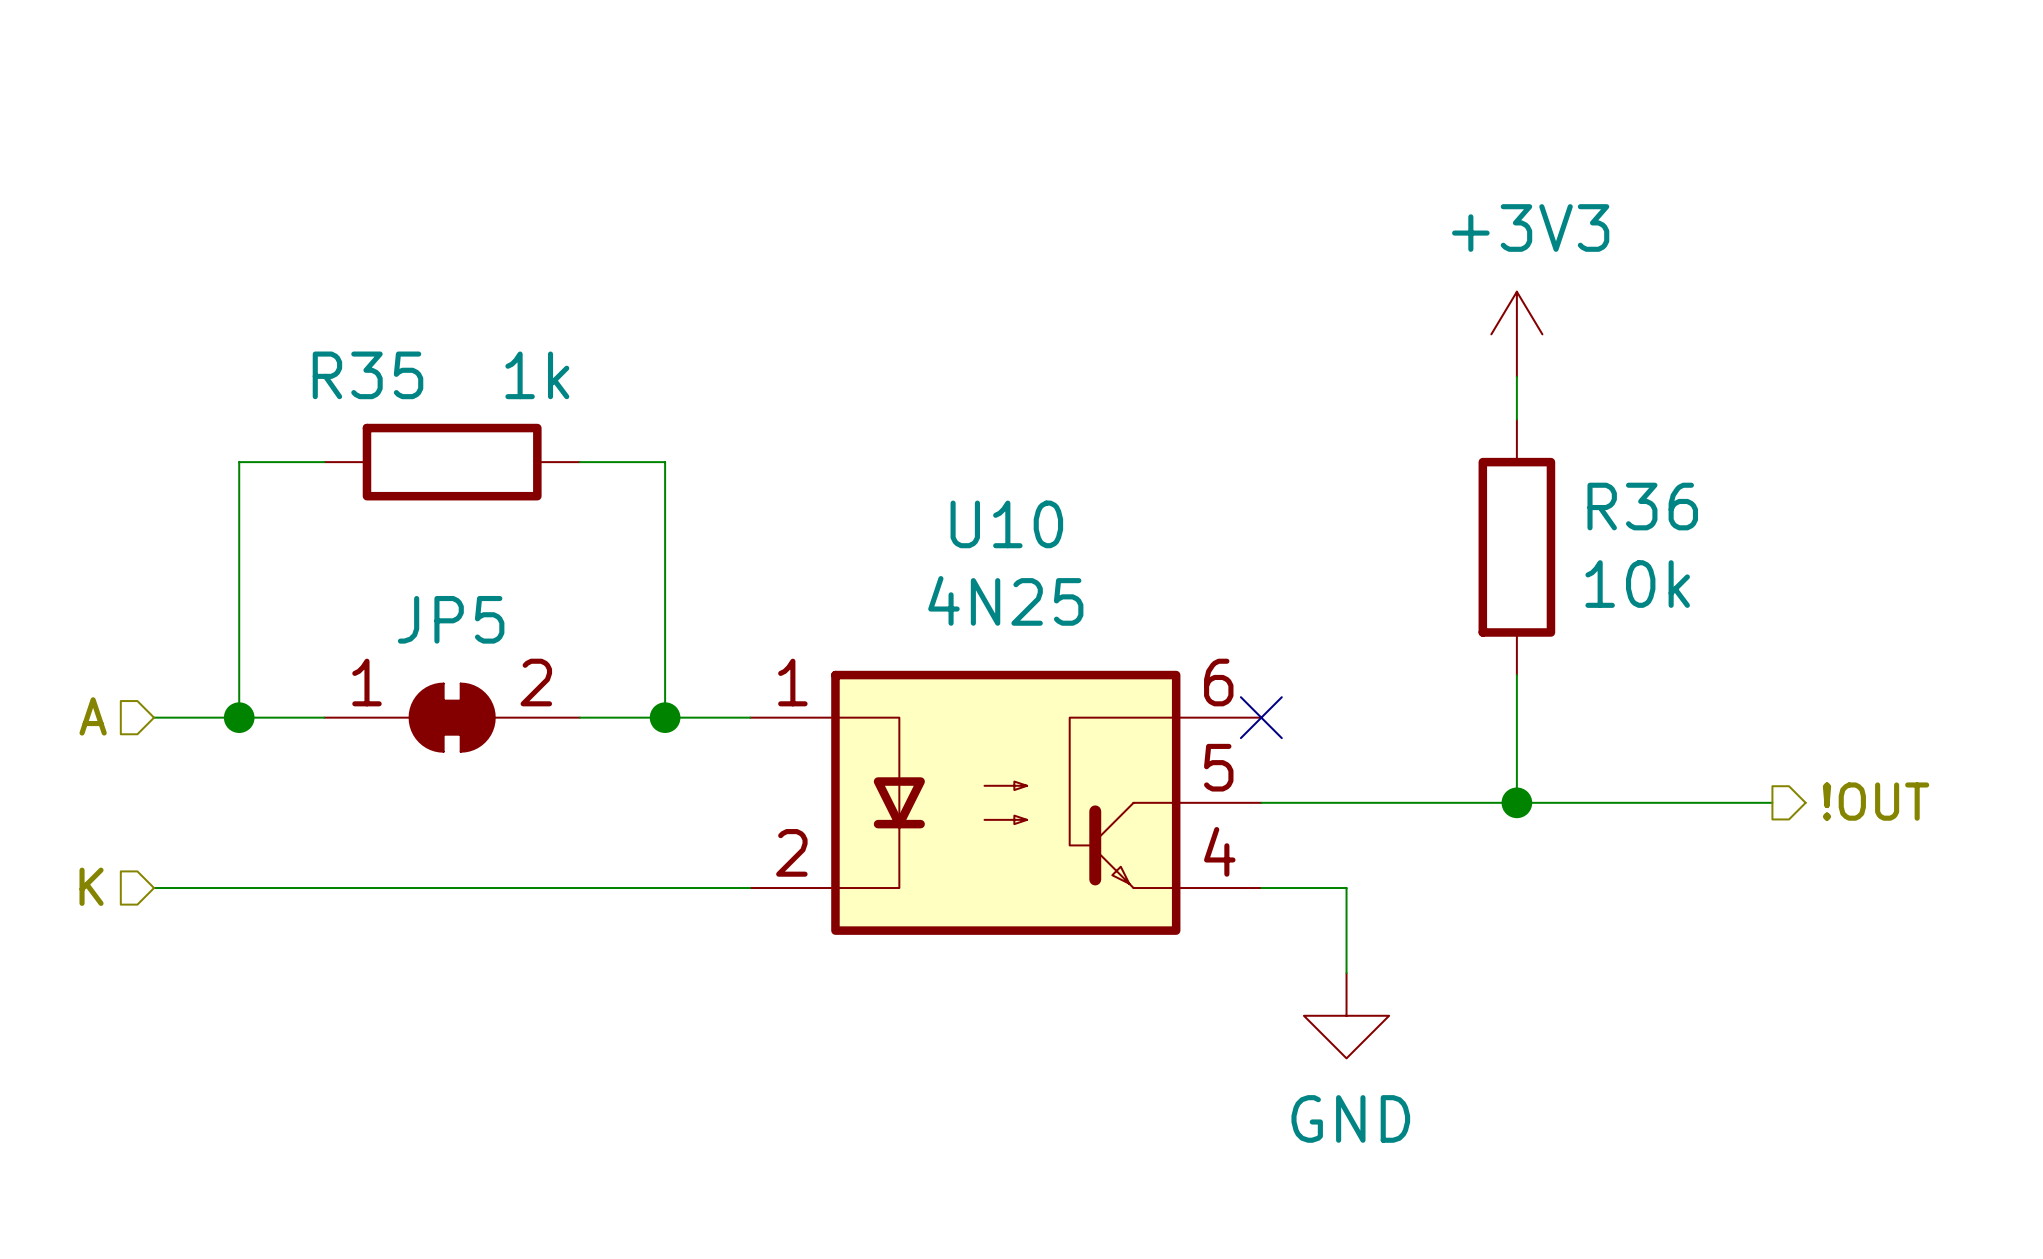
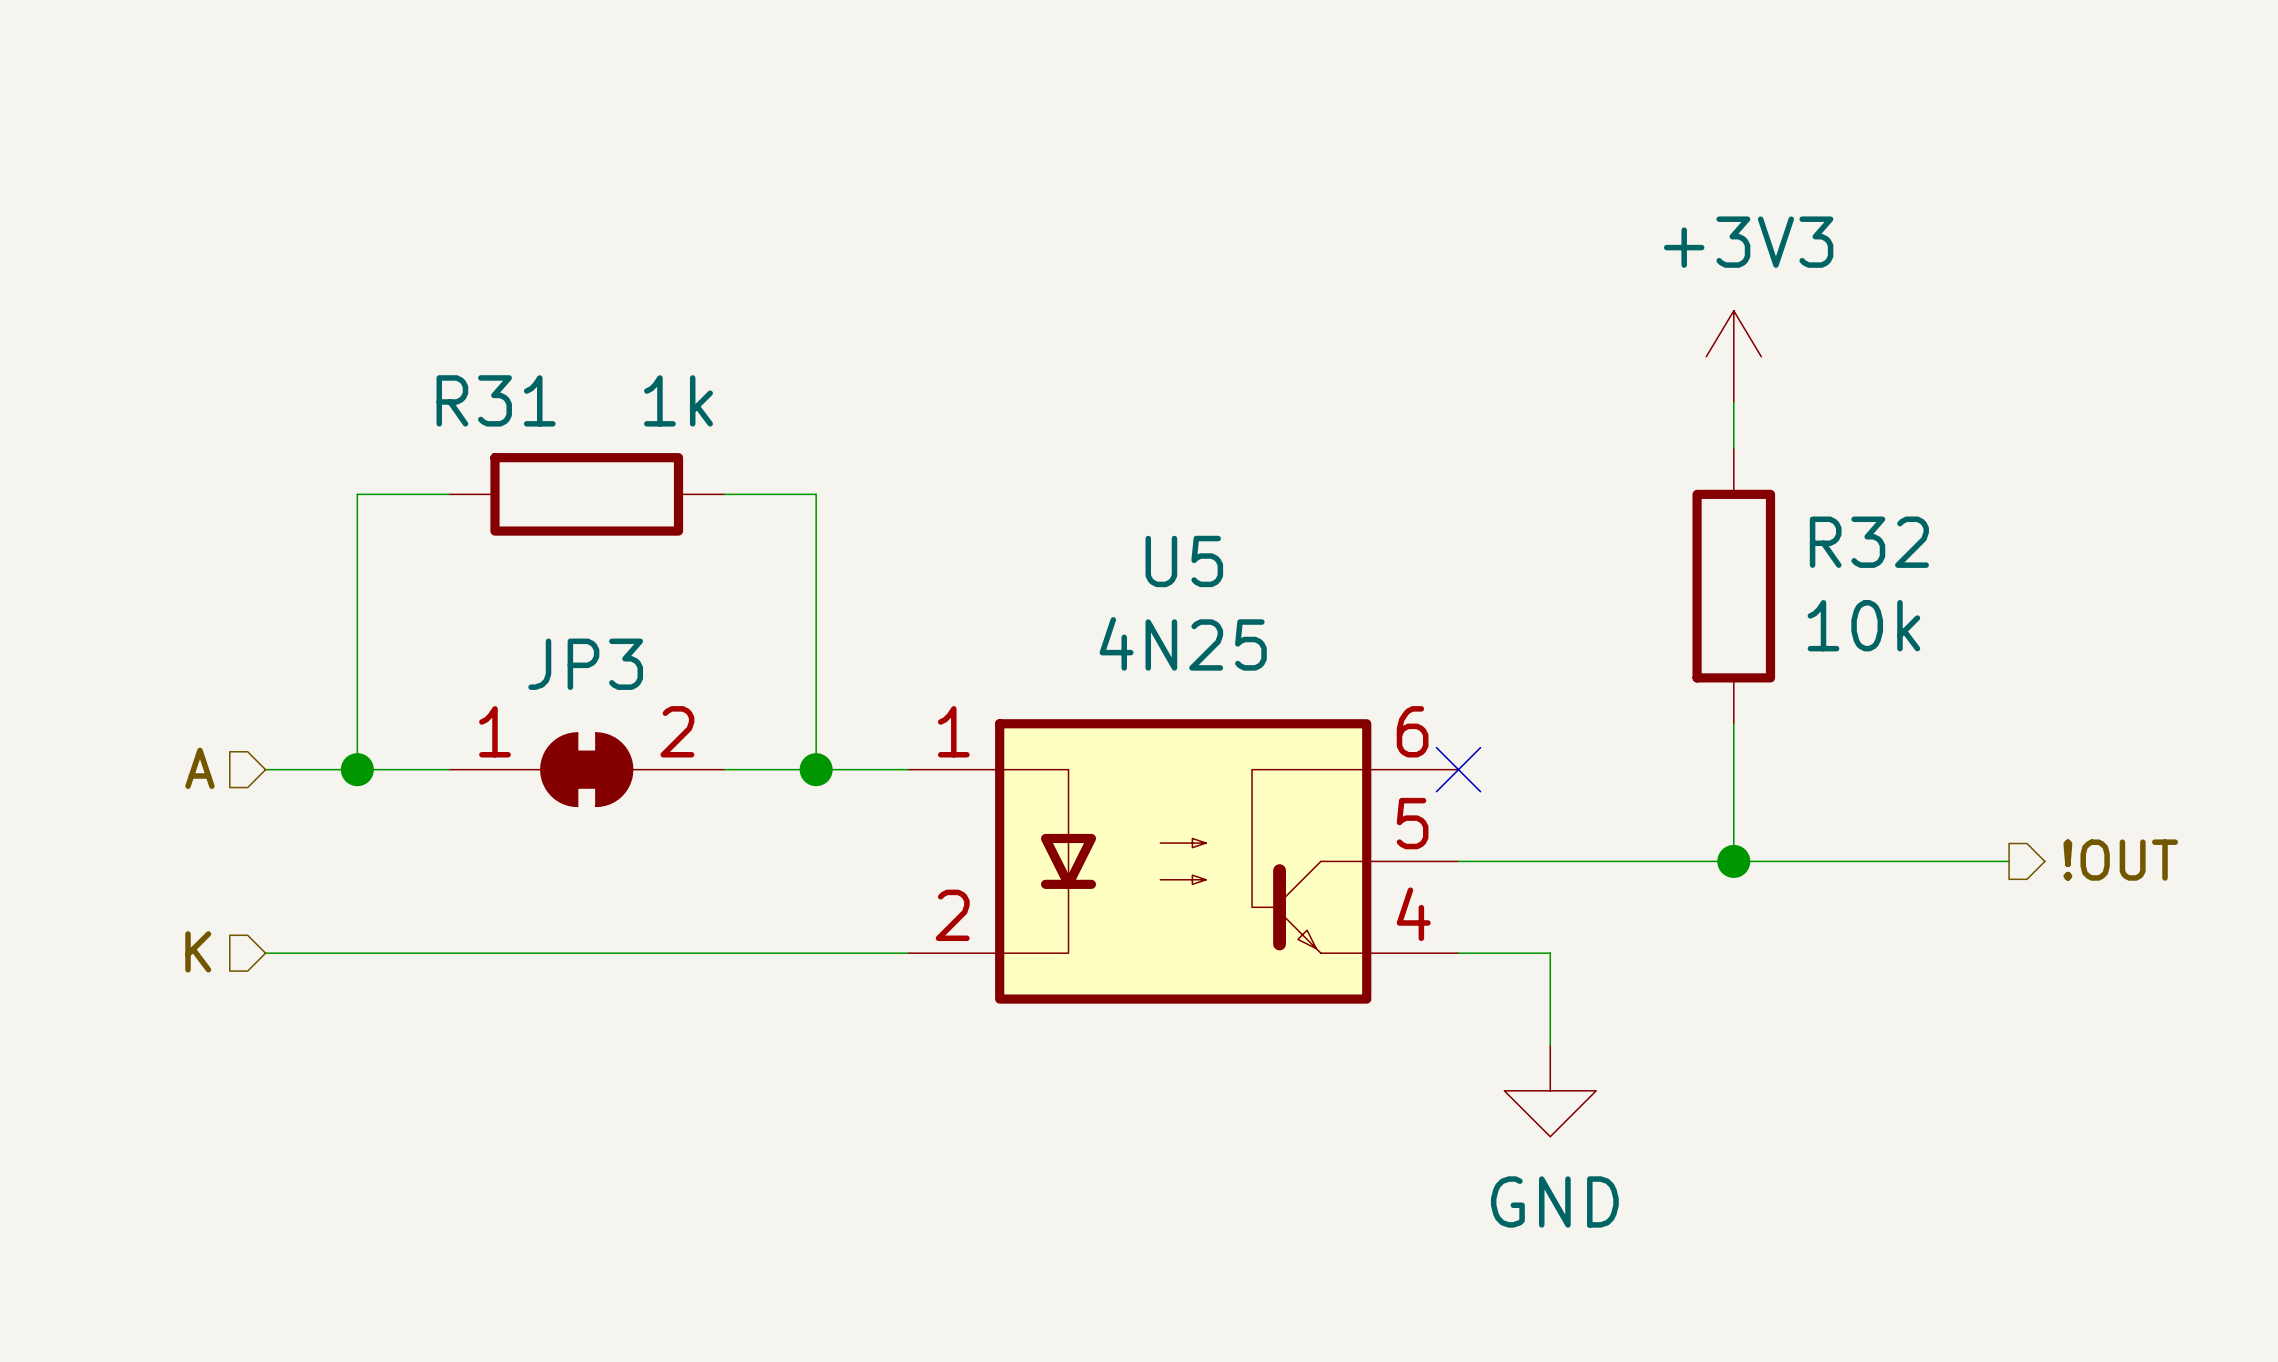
R35 name: R35 (367, 375) -> R31 (496, 400)
R36 name: R36 (1642, 506) -> R32 (1869, 542)
U10 name: U10 (1006, 524) -> U5 (1184, 561)
JP5 name: JP5 (451, 619) -> JP3 (585, 664)

